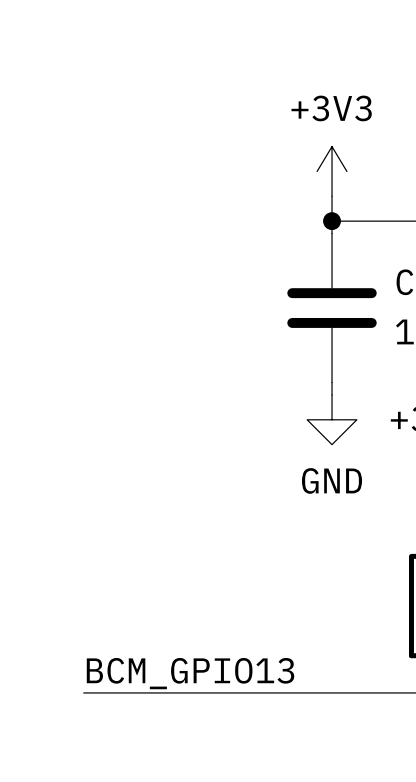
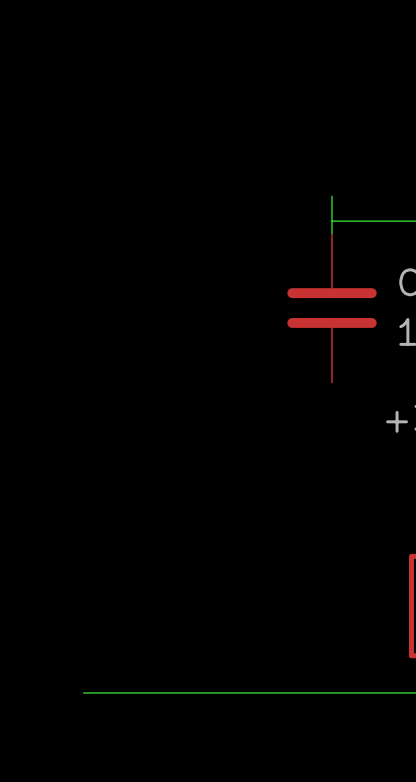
power symbol: +3V3 (332, 171) -> none
junction: (332, 221) -> none
wire: (332, 382) (332, 394) -> none
power symbol: GND (332, 419) -> none
label: BCM_GPIO13 (190, 673) -> none

